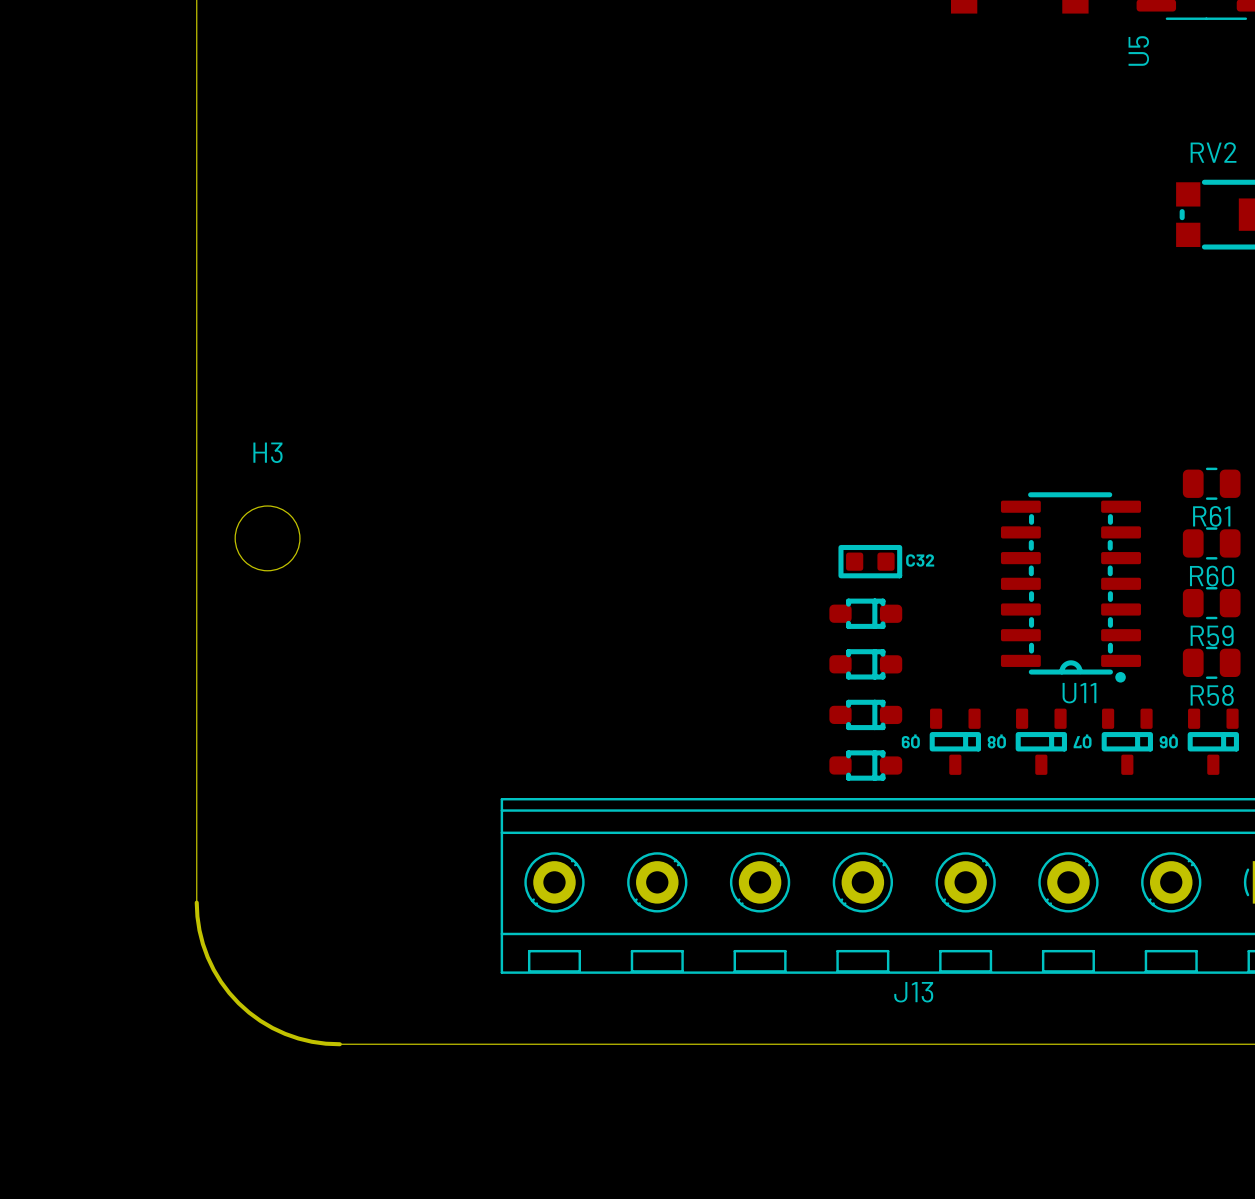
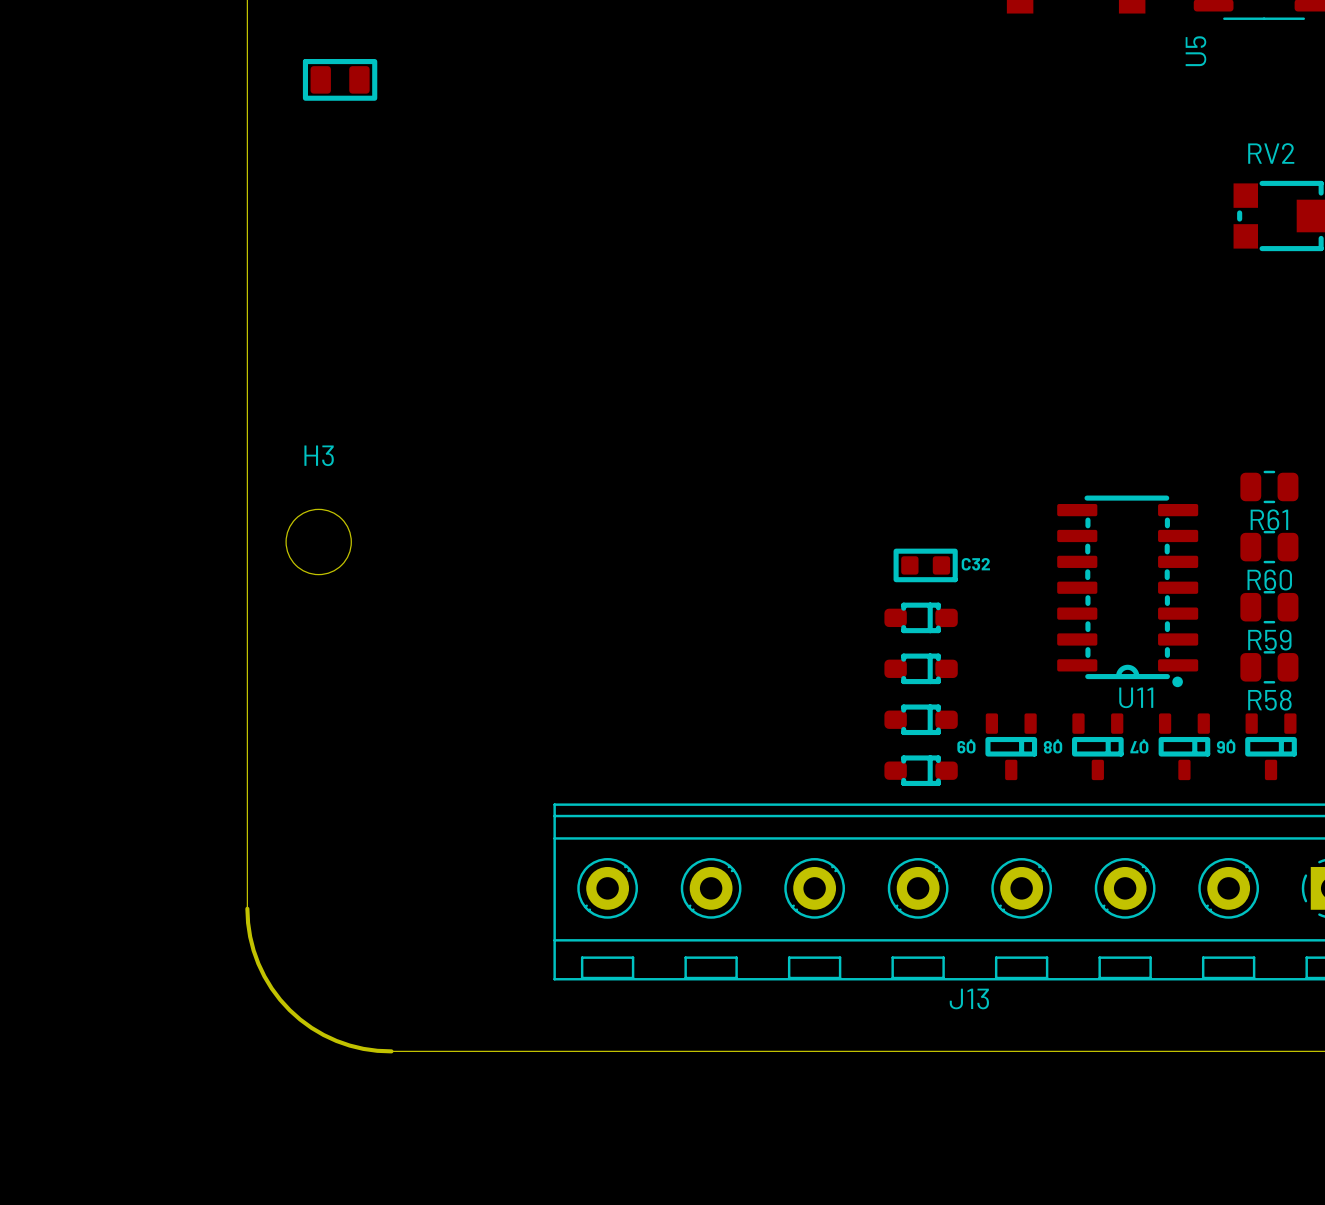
part: none -> (340, 79)

